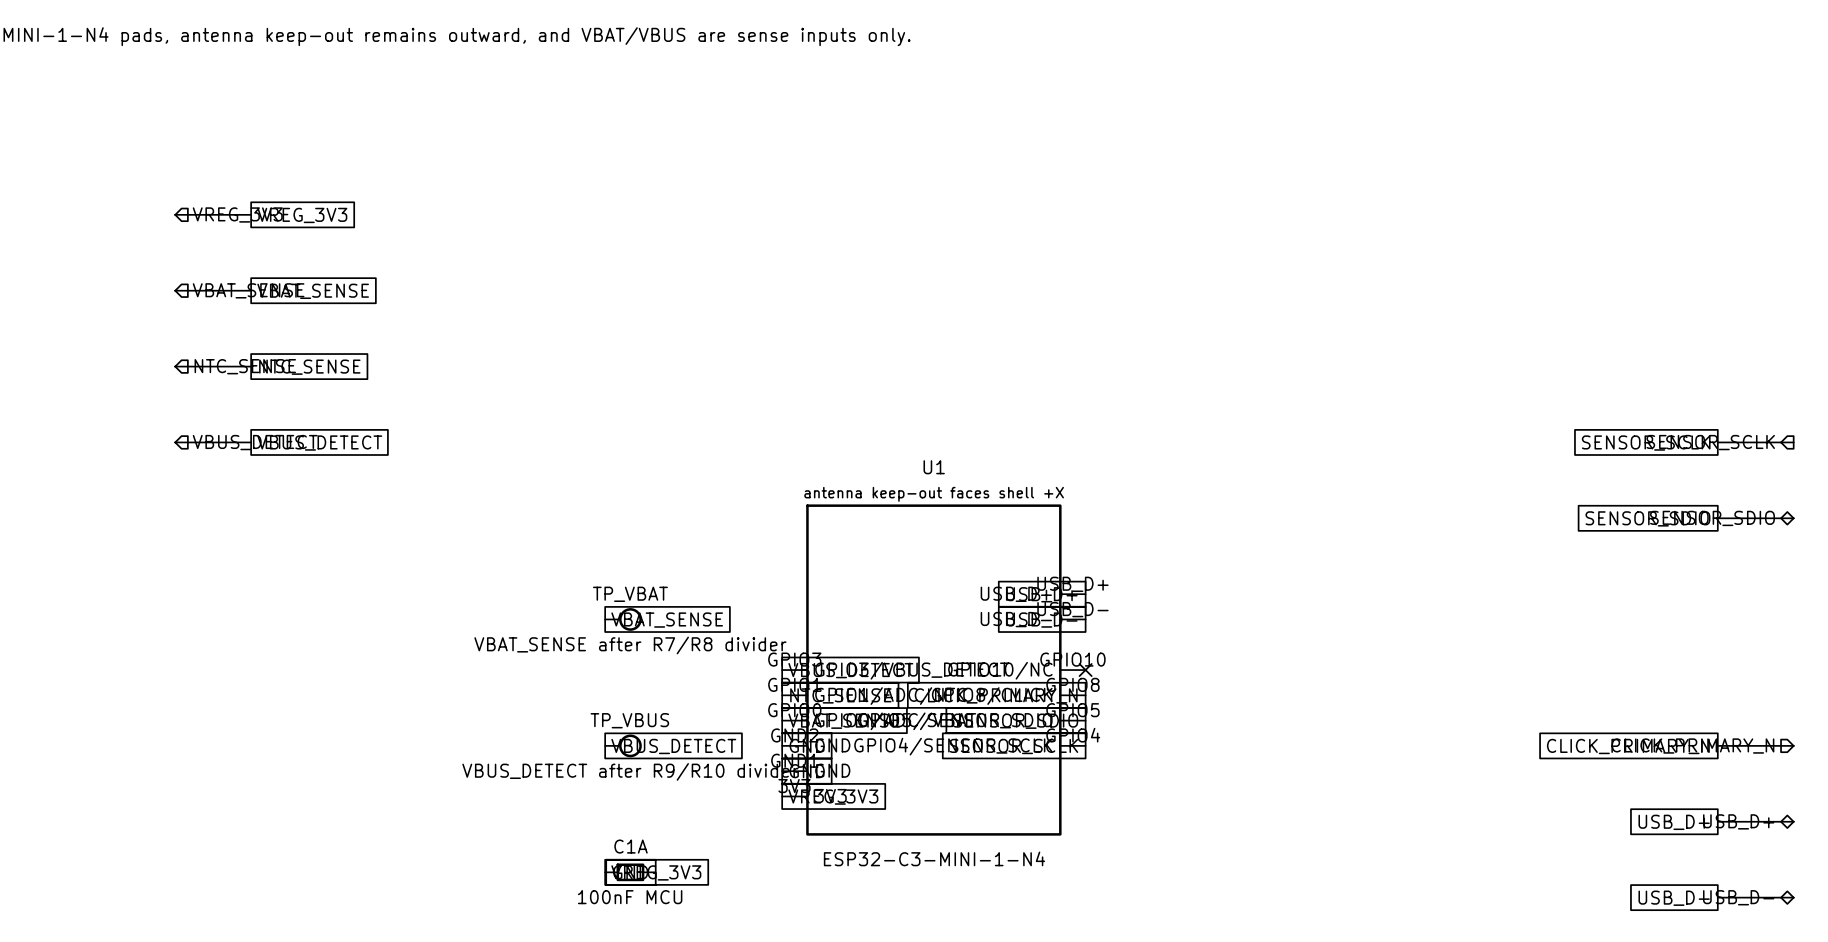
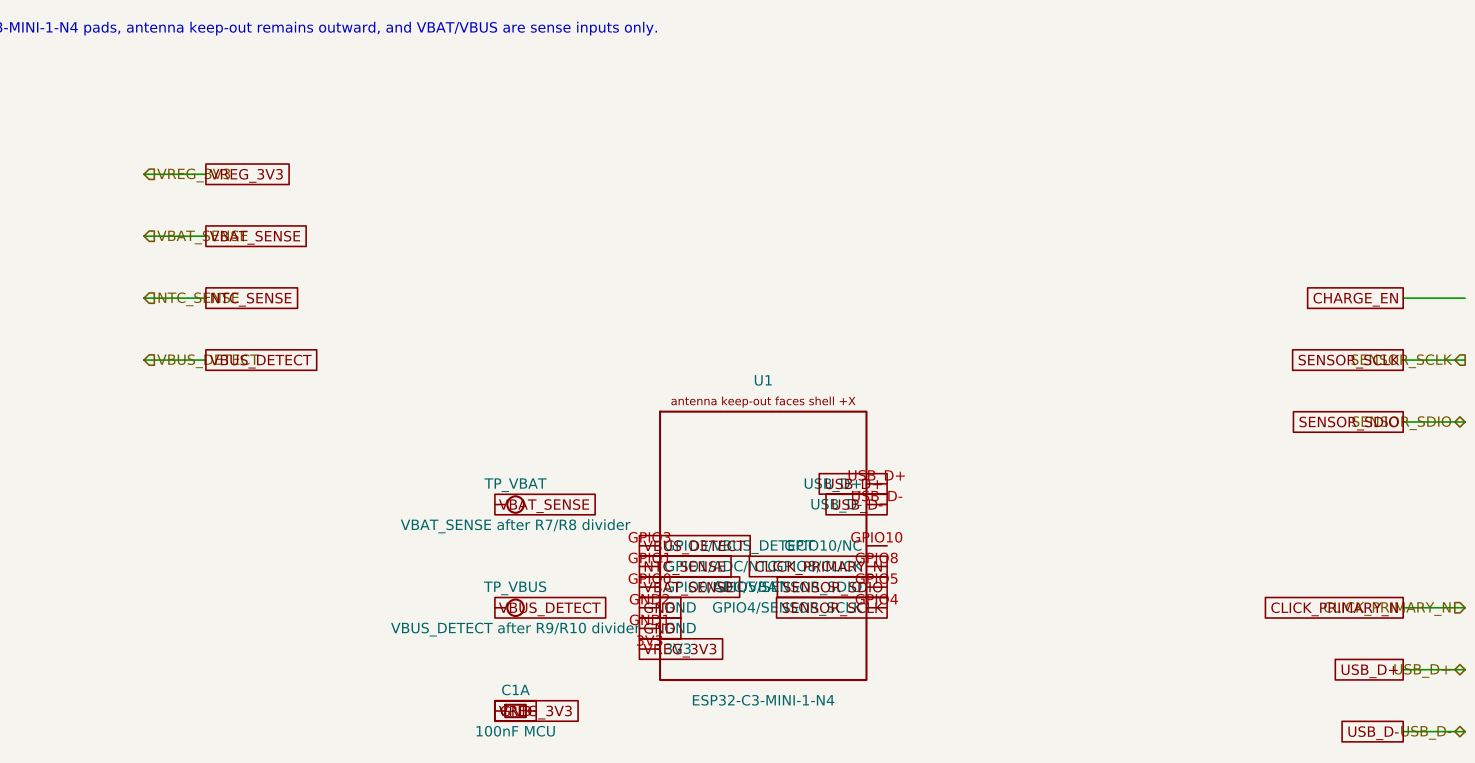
wire: none -> (1403, 298) (1465, 298)
global label: none -> CHARGE_EN (1355, 299)
no-connect mark: (1085, 670) -> none

